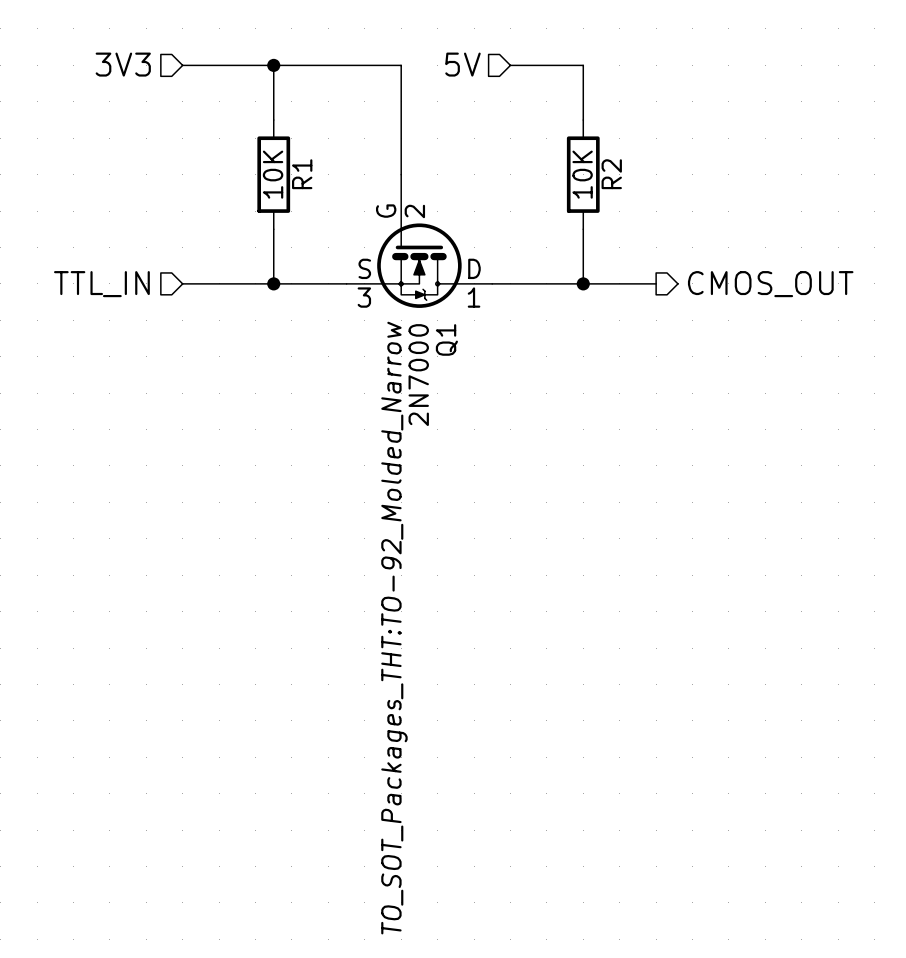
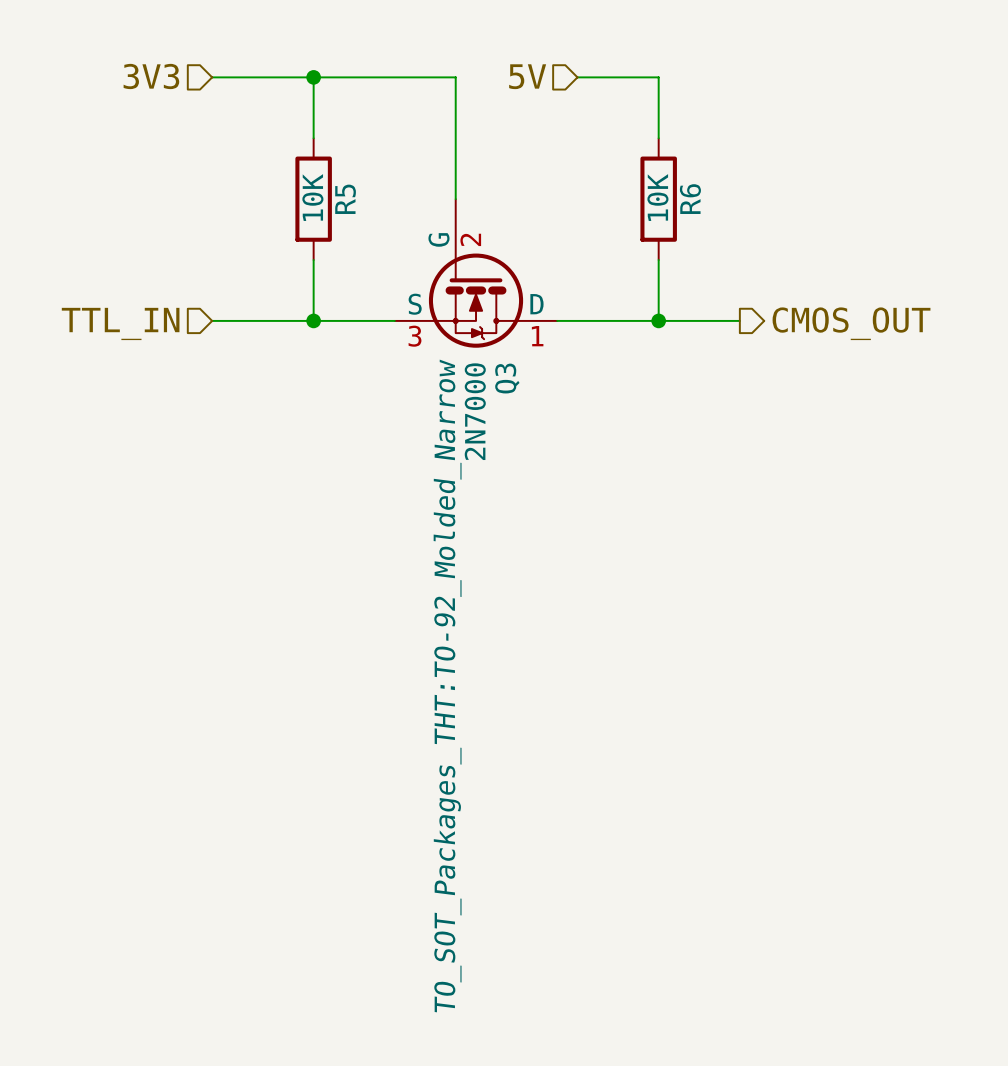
R1 name: R1 (302, 174) -> R5 (345, 199)
R2 name: R2 (611, 174) -> R6 (690, 199)
Q1 name: Q1 (446, 339) -> Q3 (507, 378)

